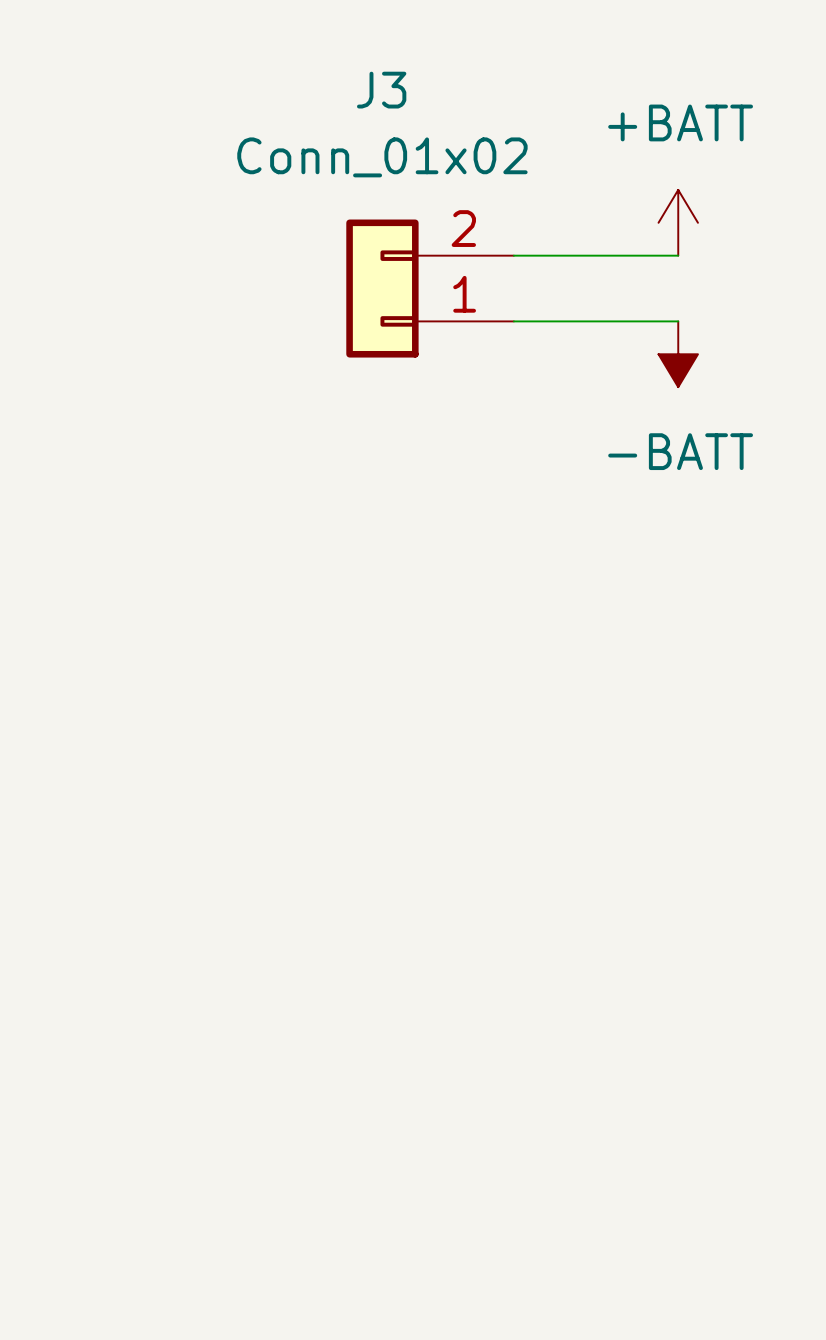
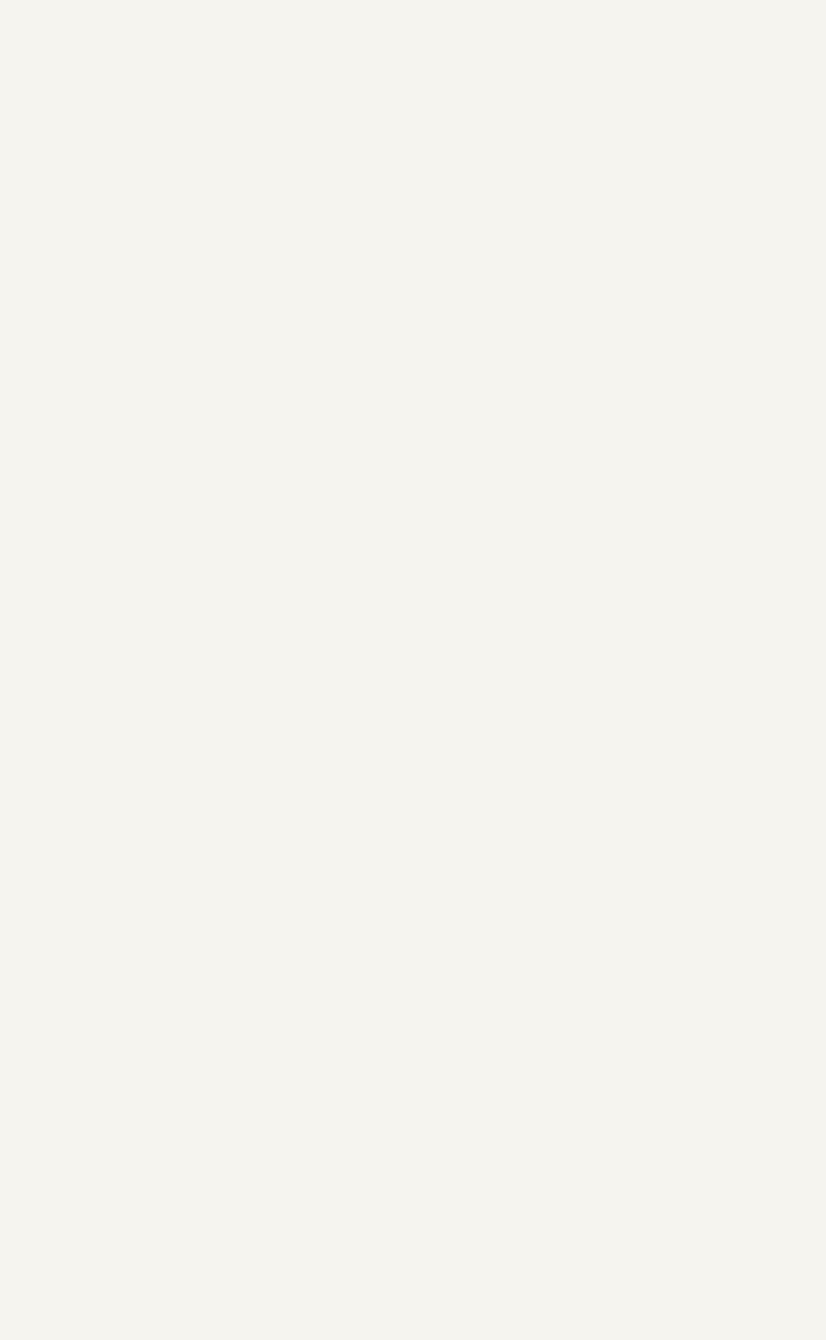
power symbol: +BATT (678, 222) -> none
wire: (513, 255) (678, 255) -> none
J3: Conn_01x02 (430, 288) -> none
wire: (513, 321) (678, 321) -> none
power symbol: -BATT (678, 354) -> none

